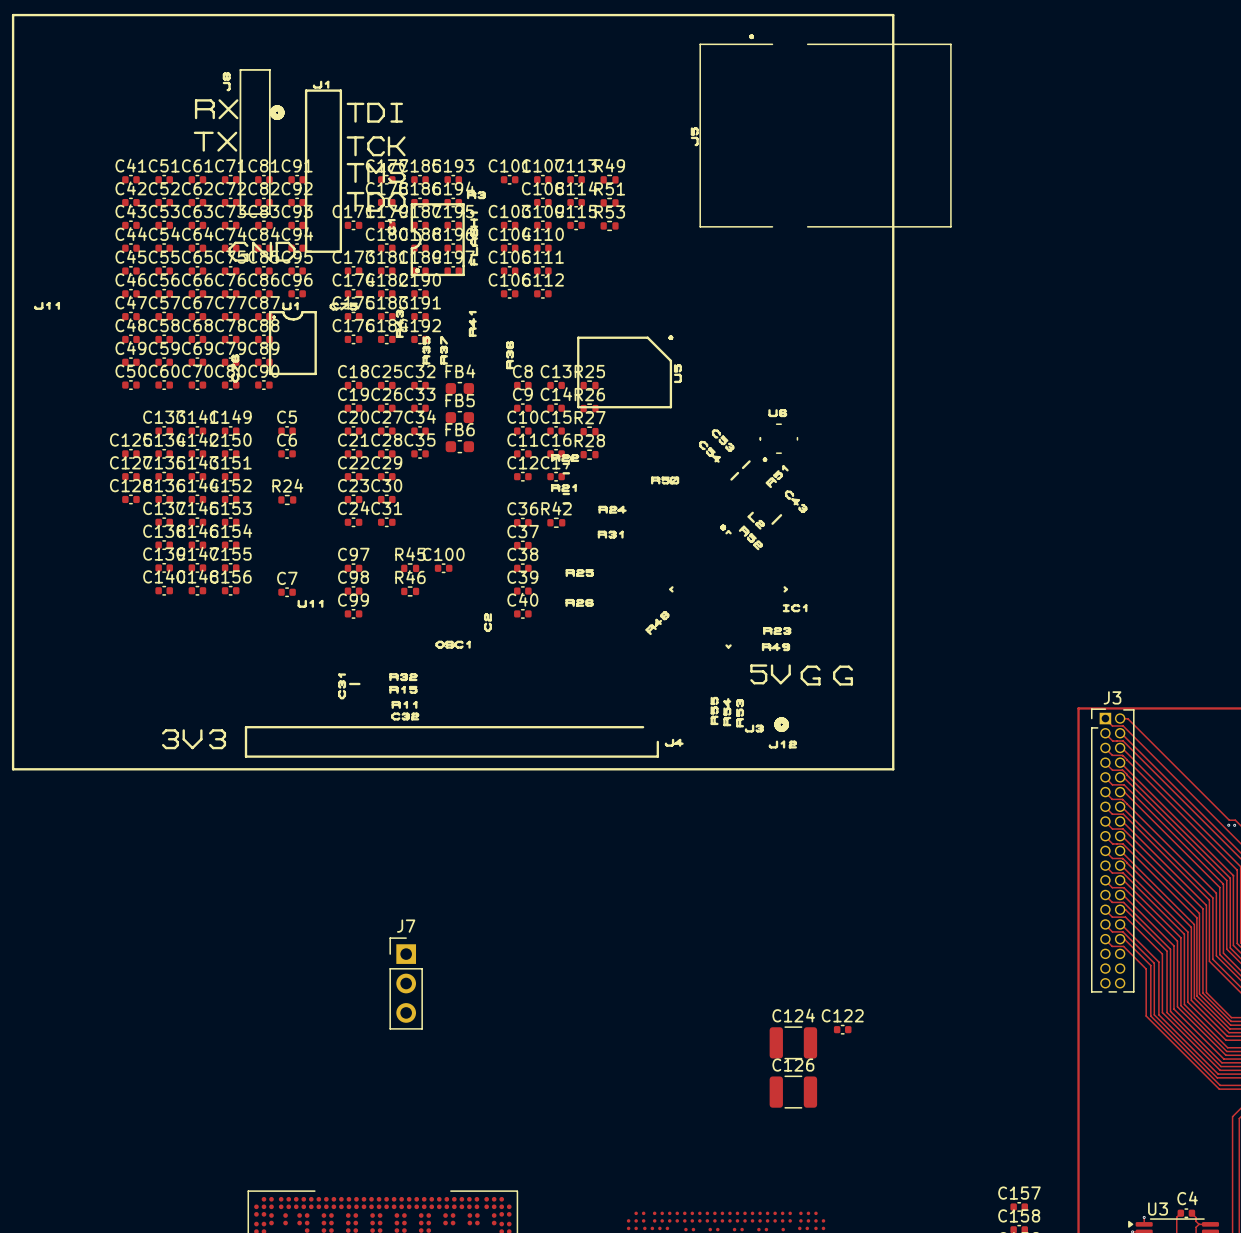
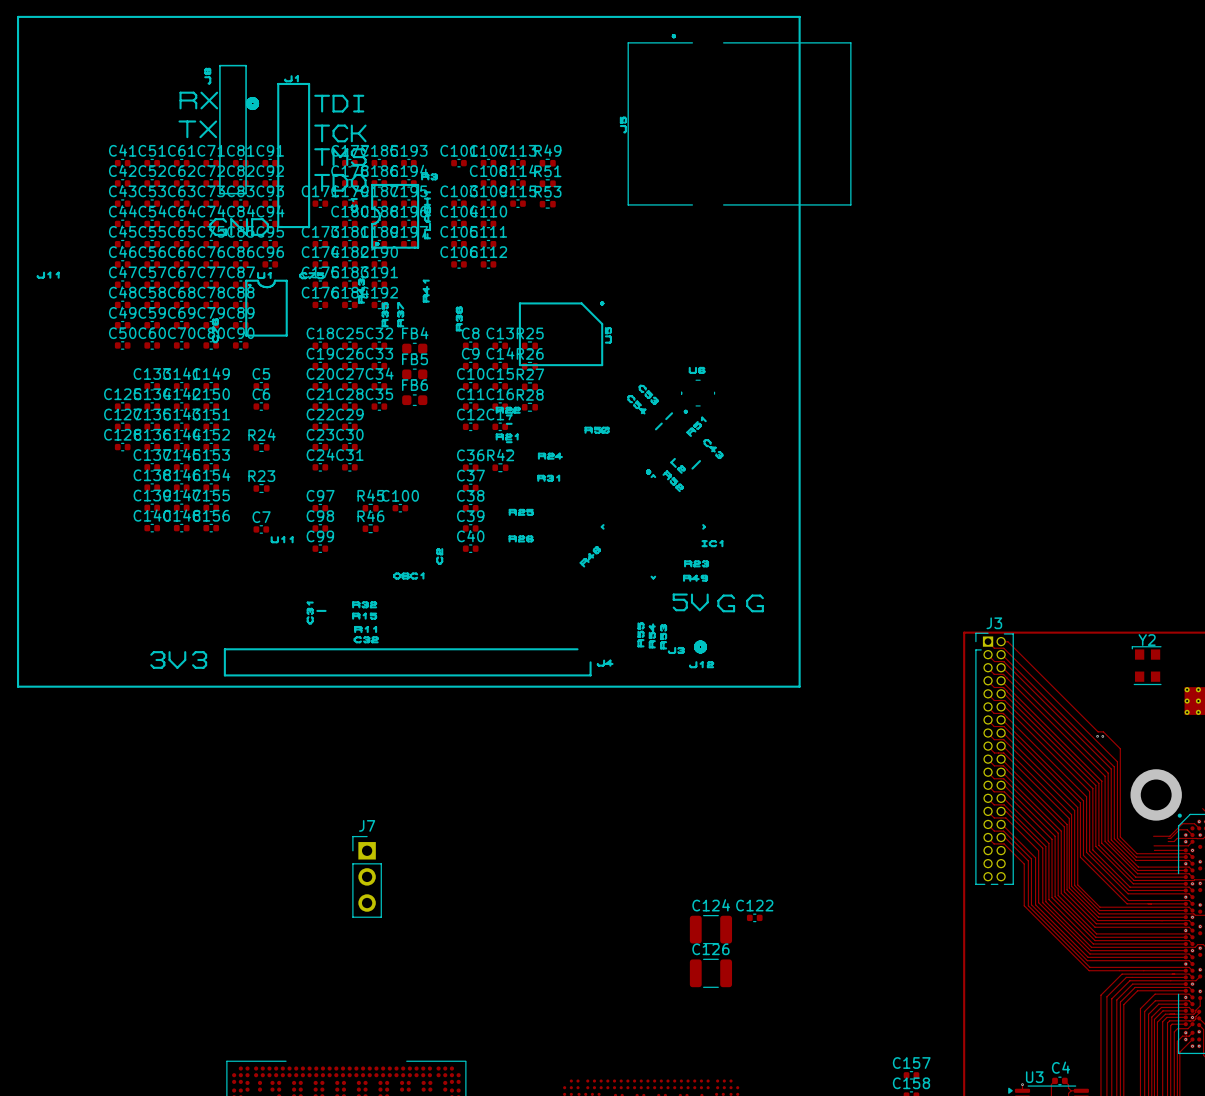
R23: none -> (261, 488)

